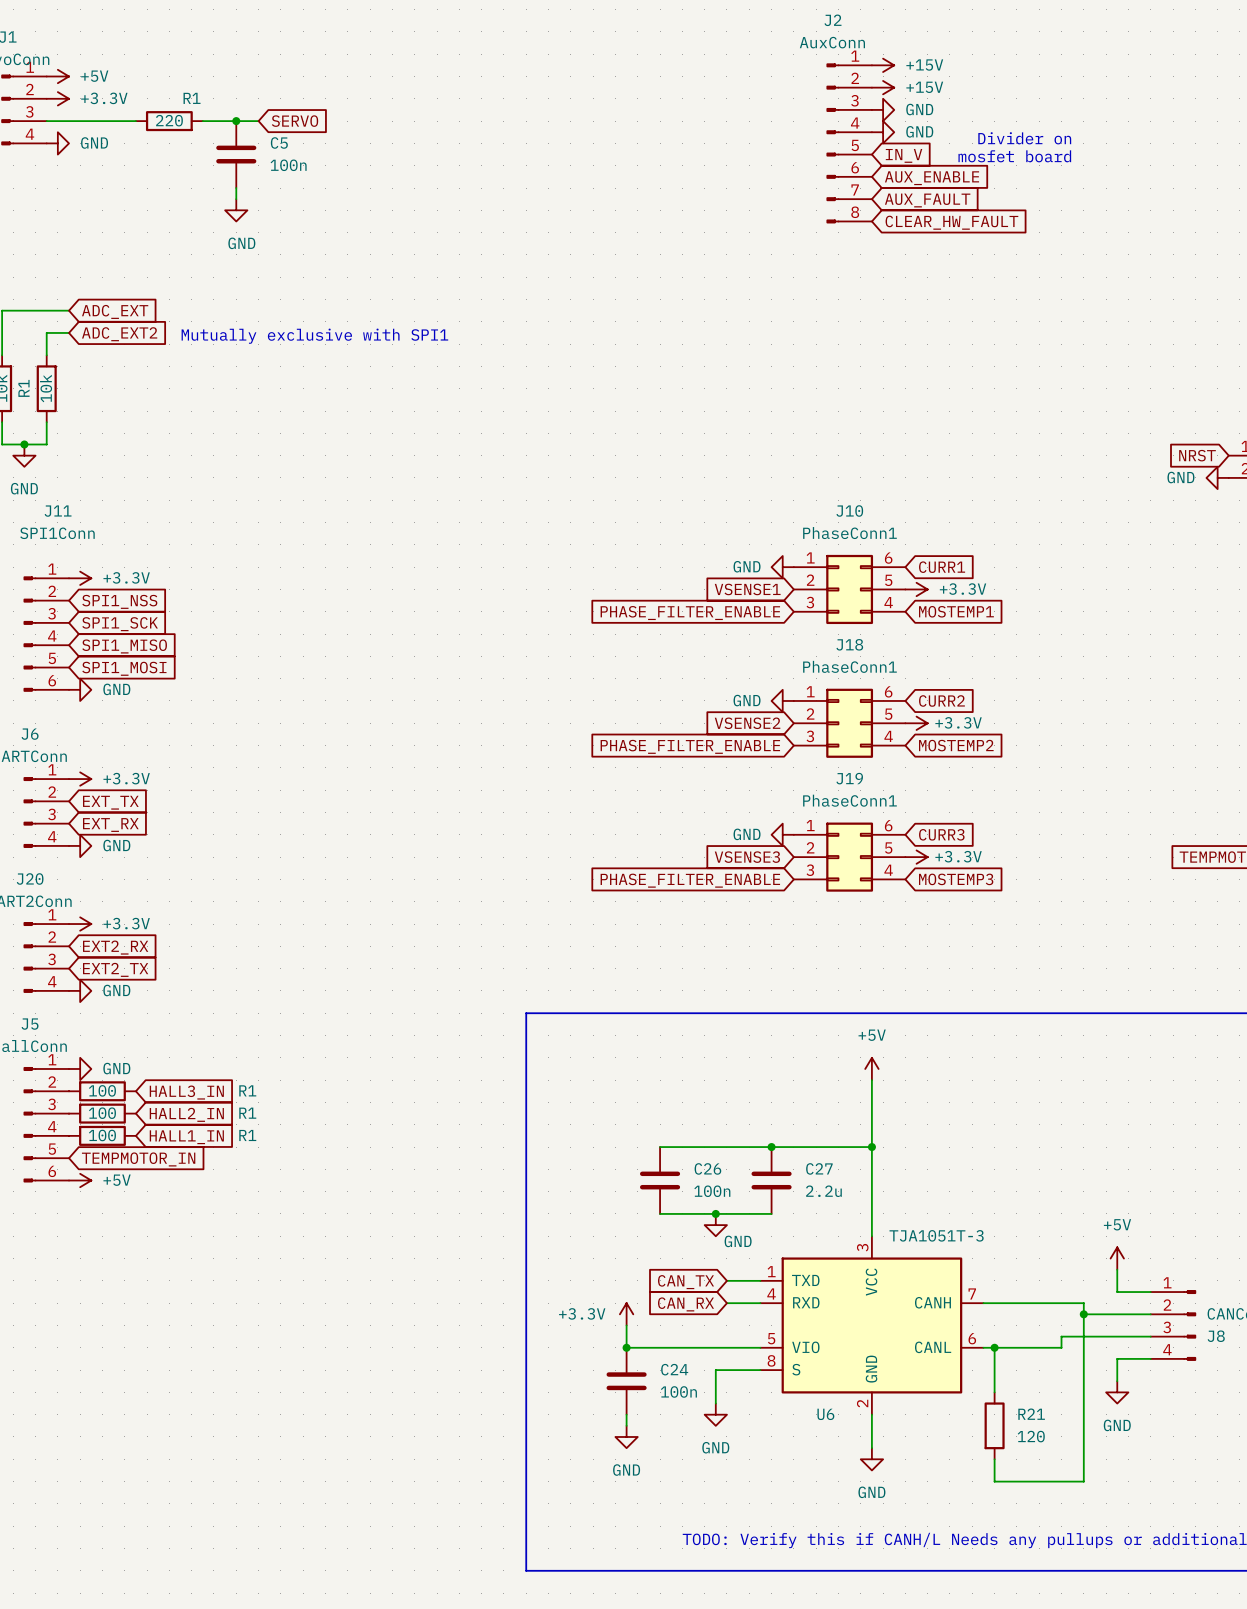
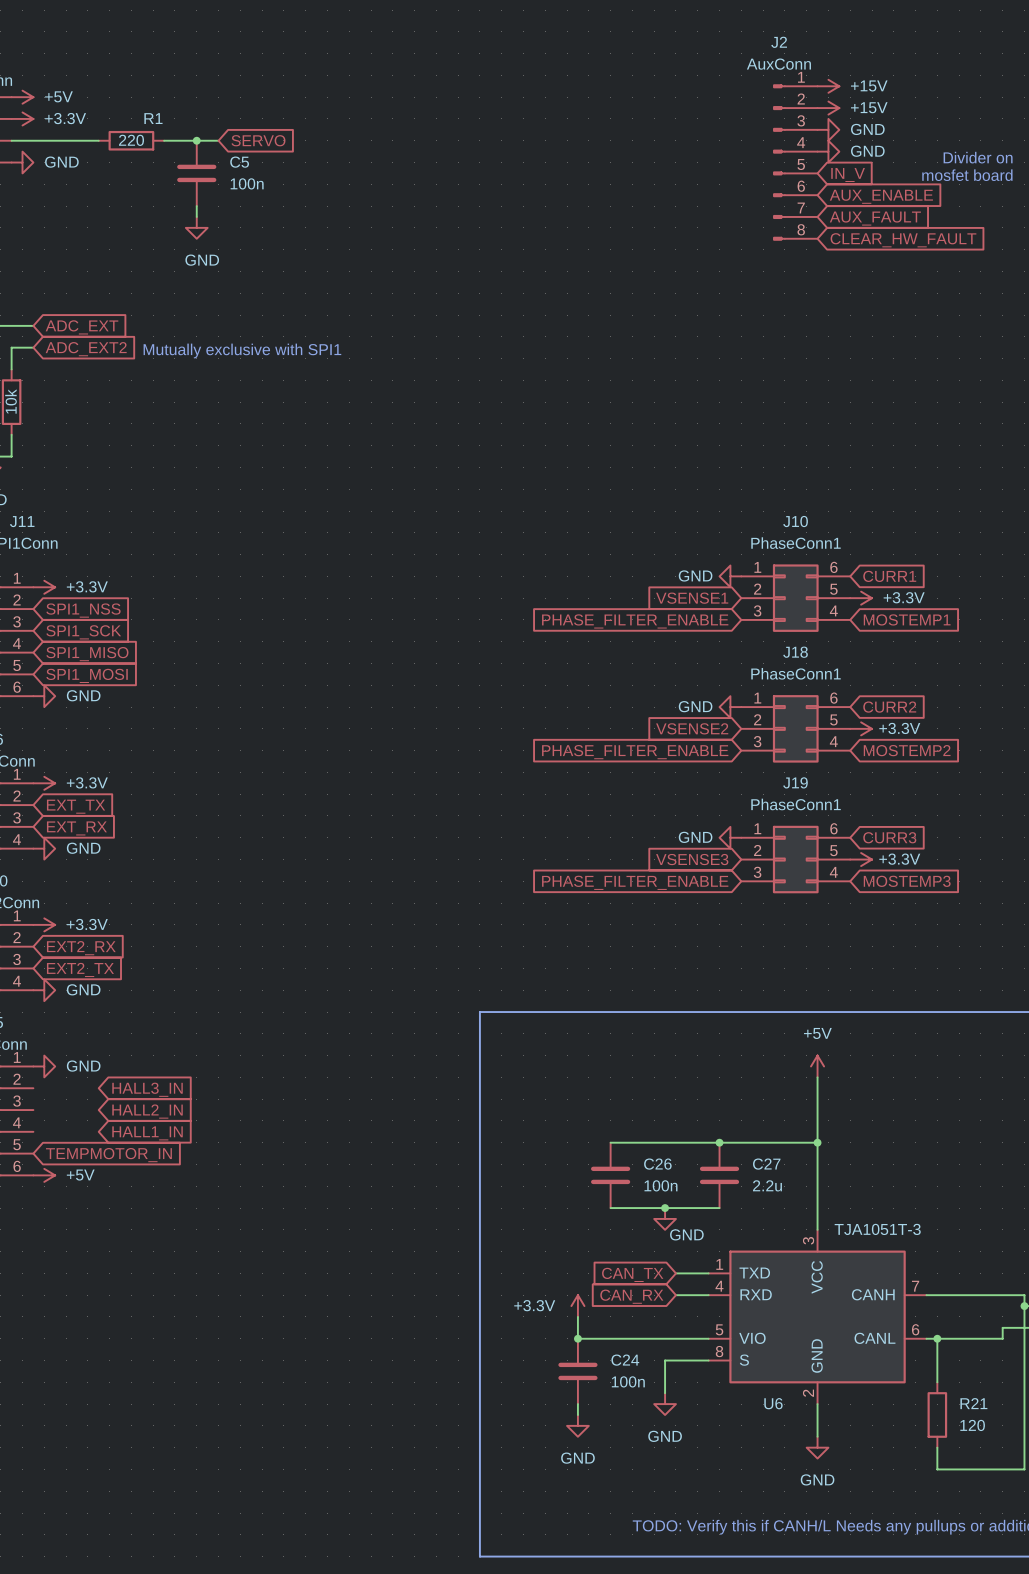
R1: 100 (102, 1091) -> none
R1: 100 (102, 1113) -> none
R1: 100 (102, 1135) -> none

